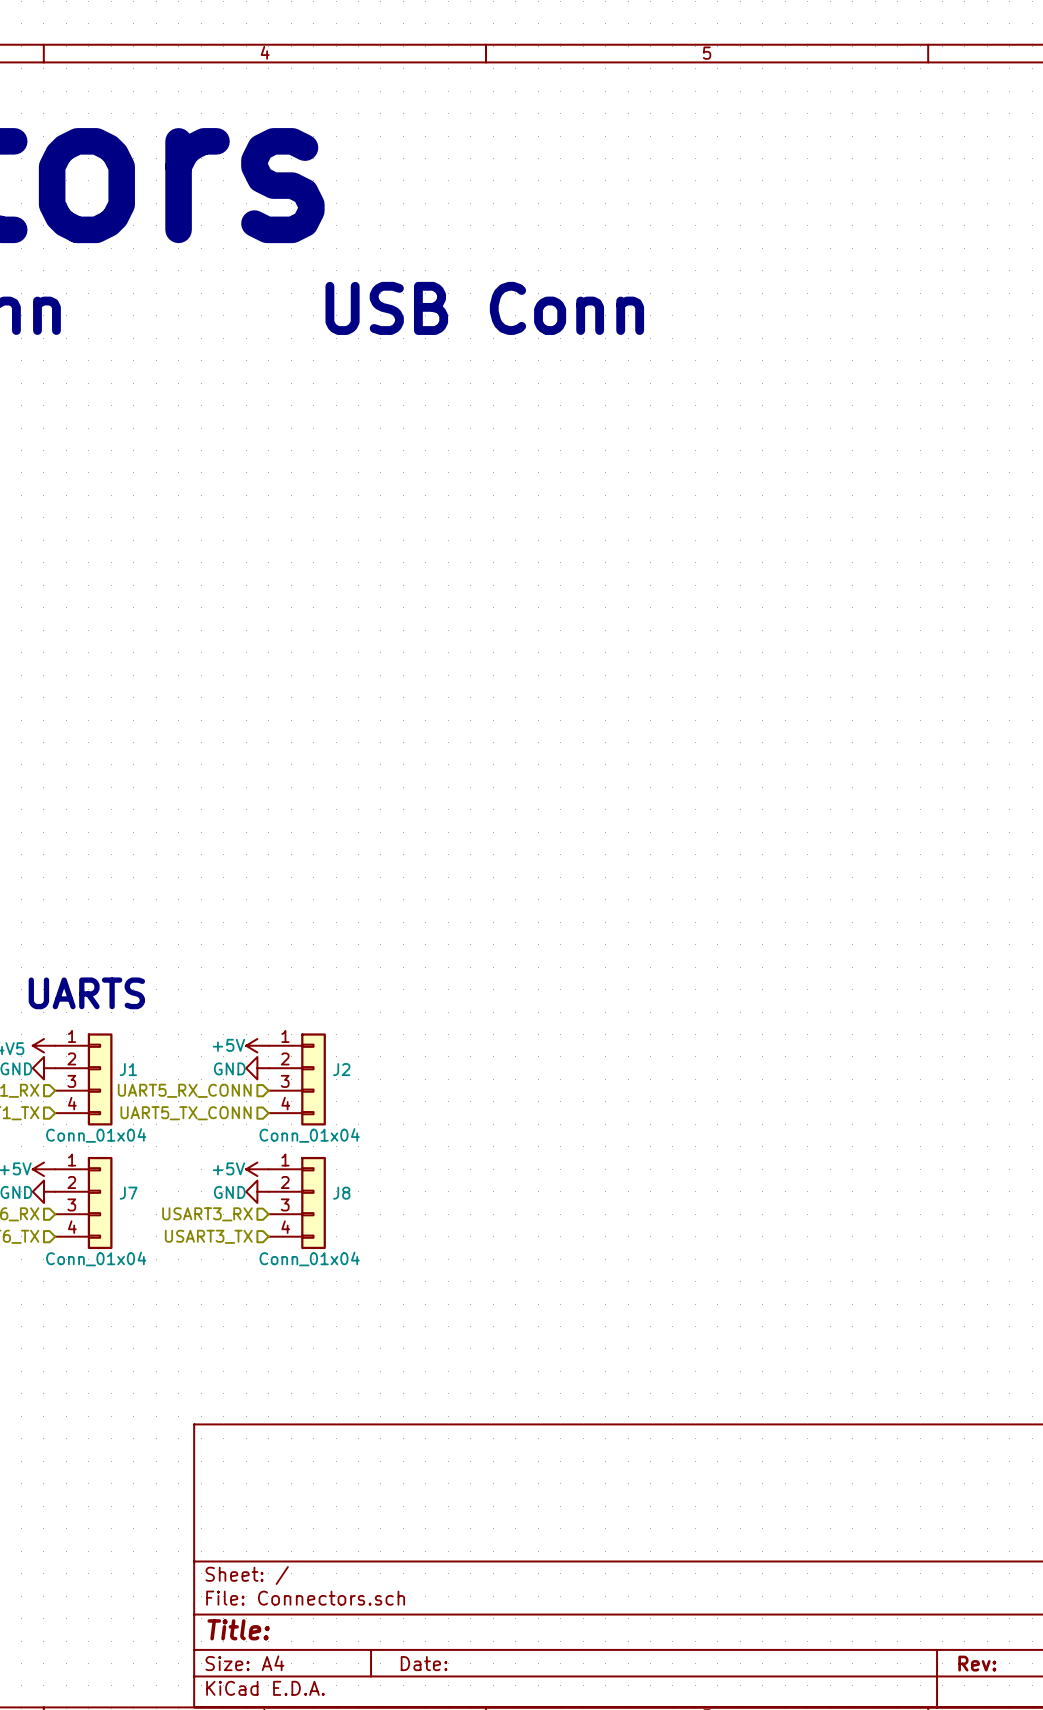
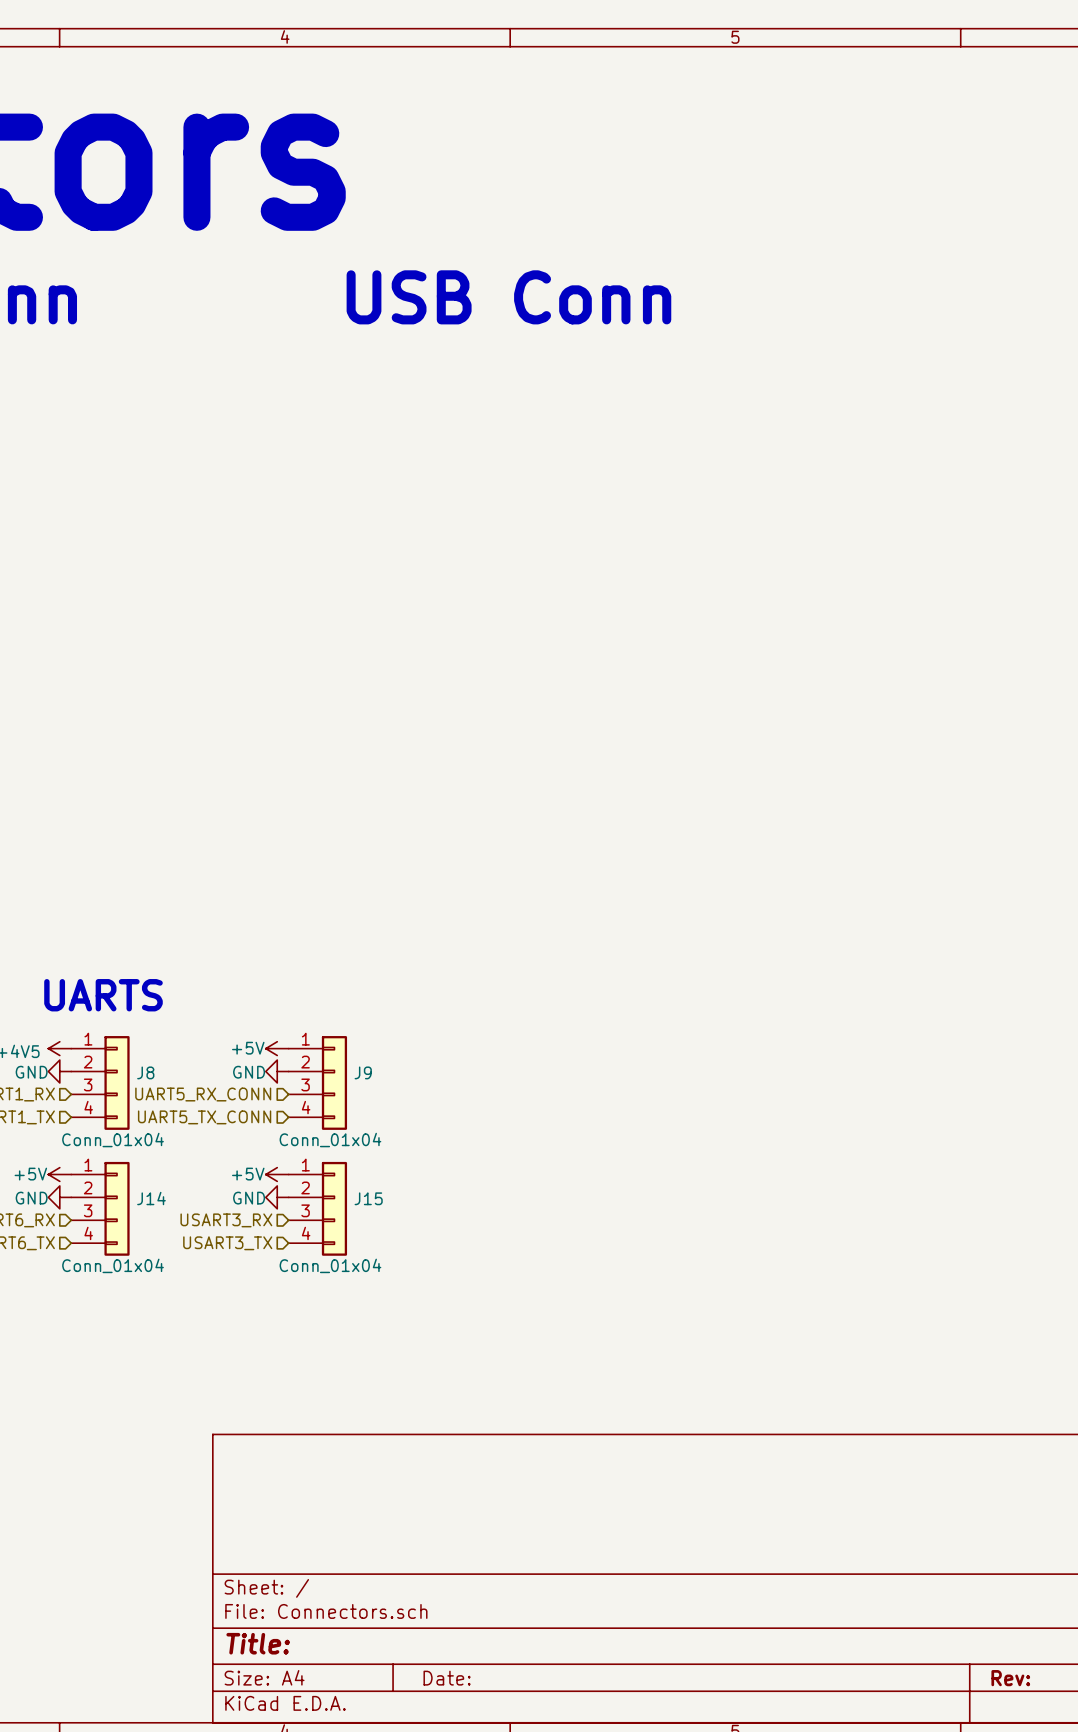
J1 name: J1 (128, 1069) -> J8 (145, 1072)
J2 name: J2 (341, 1069) -> J9 (363, 1072)
J7 name: J7 (128, 1193) -> J14 (151, 1198)
J8 name: J8 (341, 1193) -> J15 (368, 1198)

